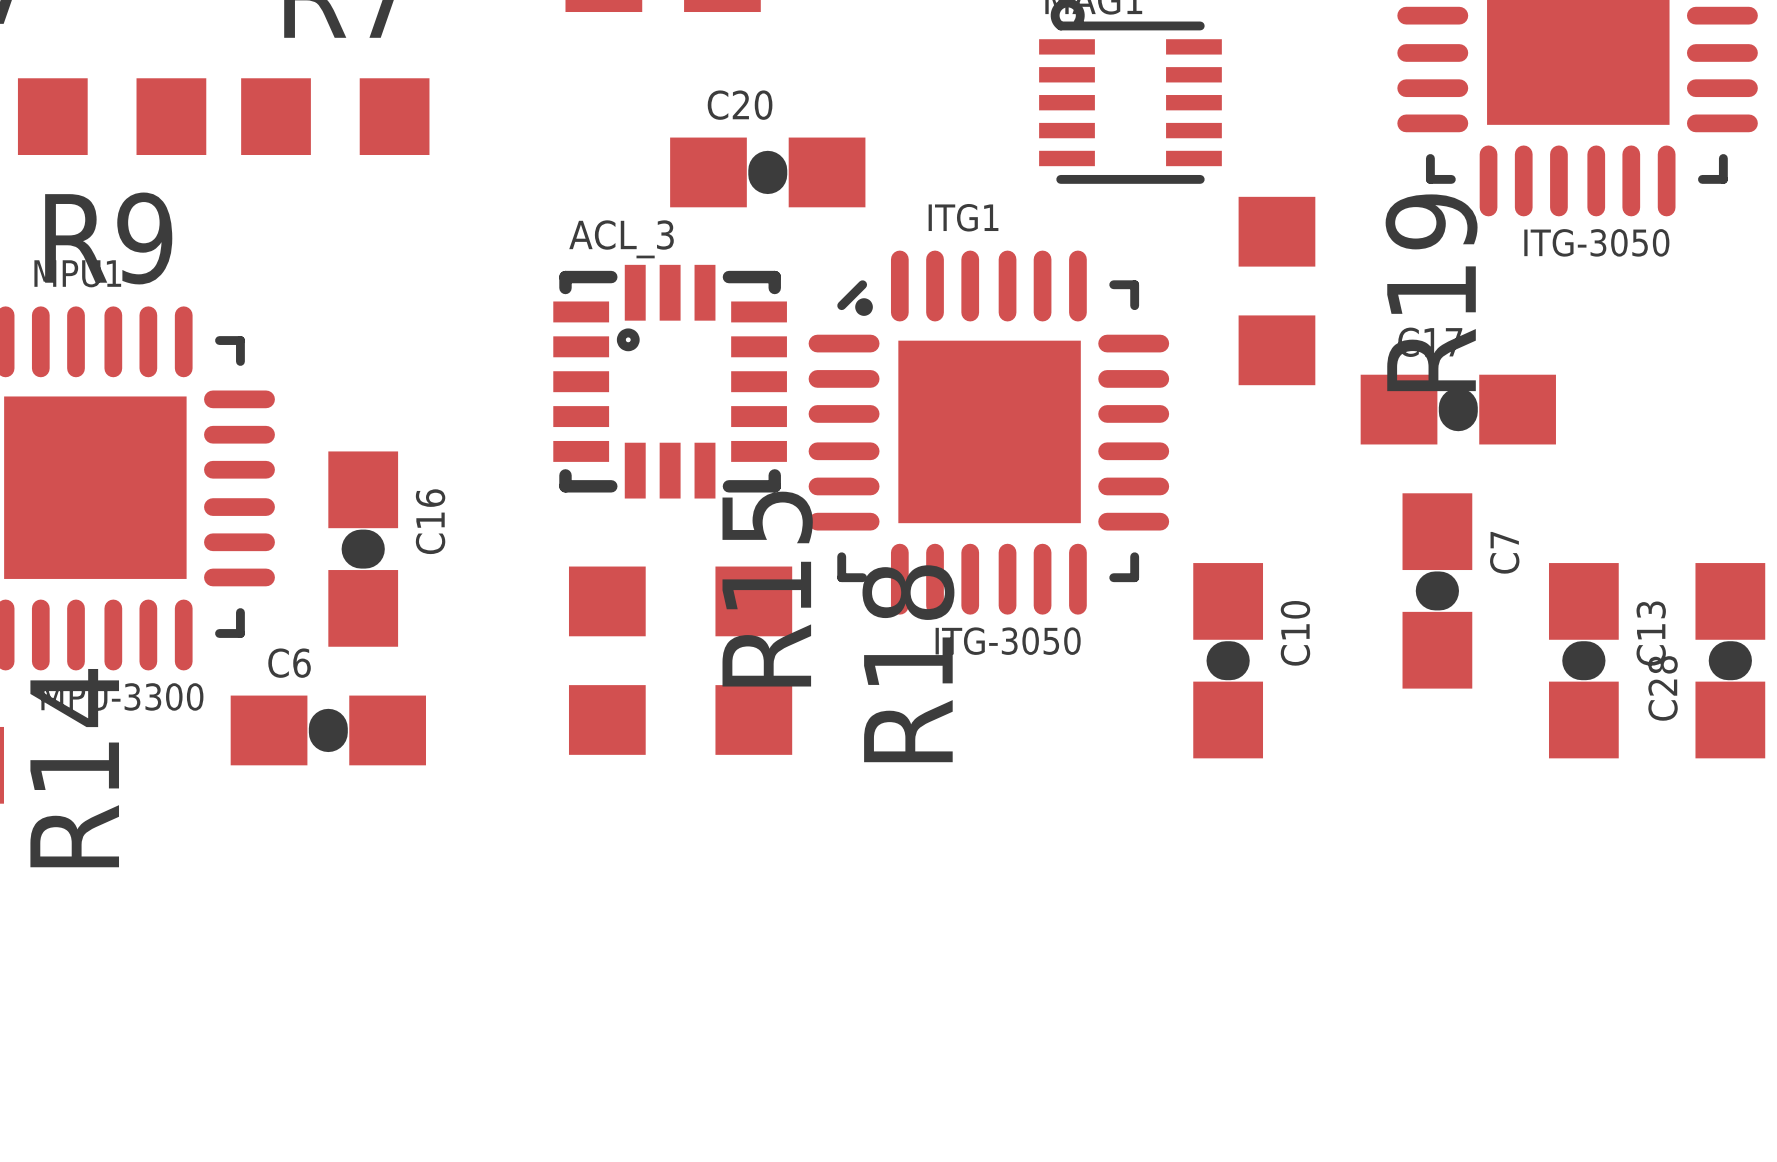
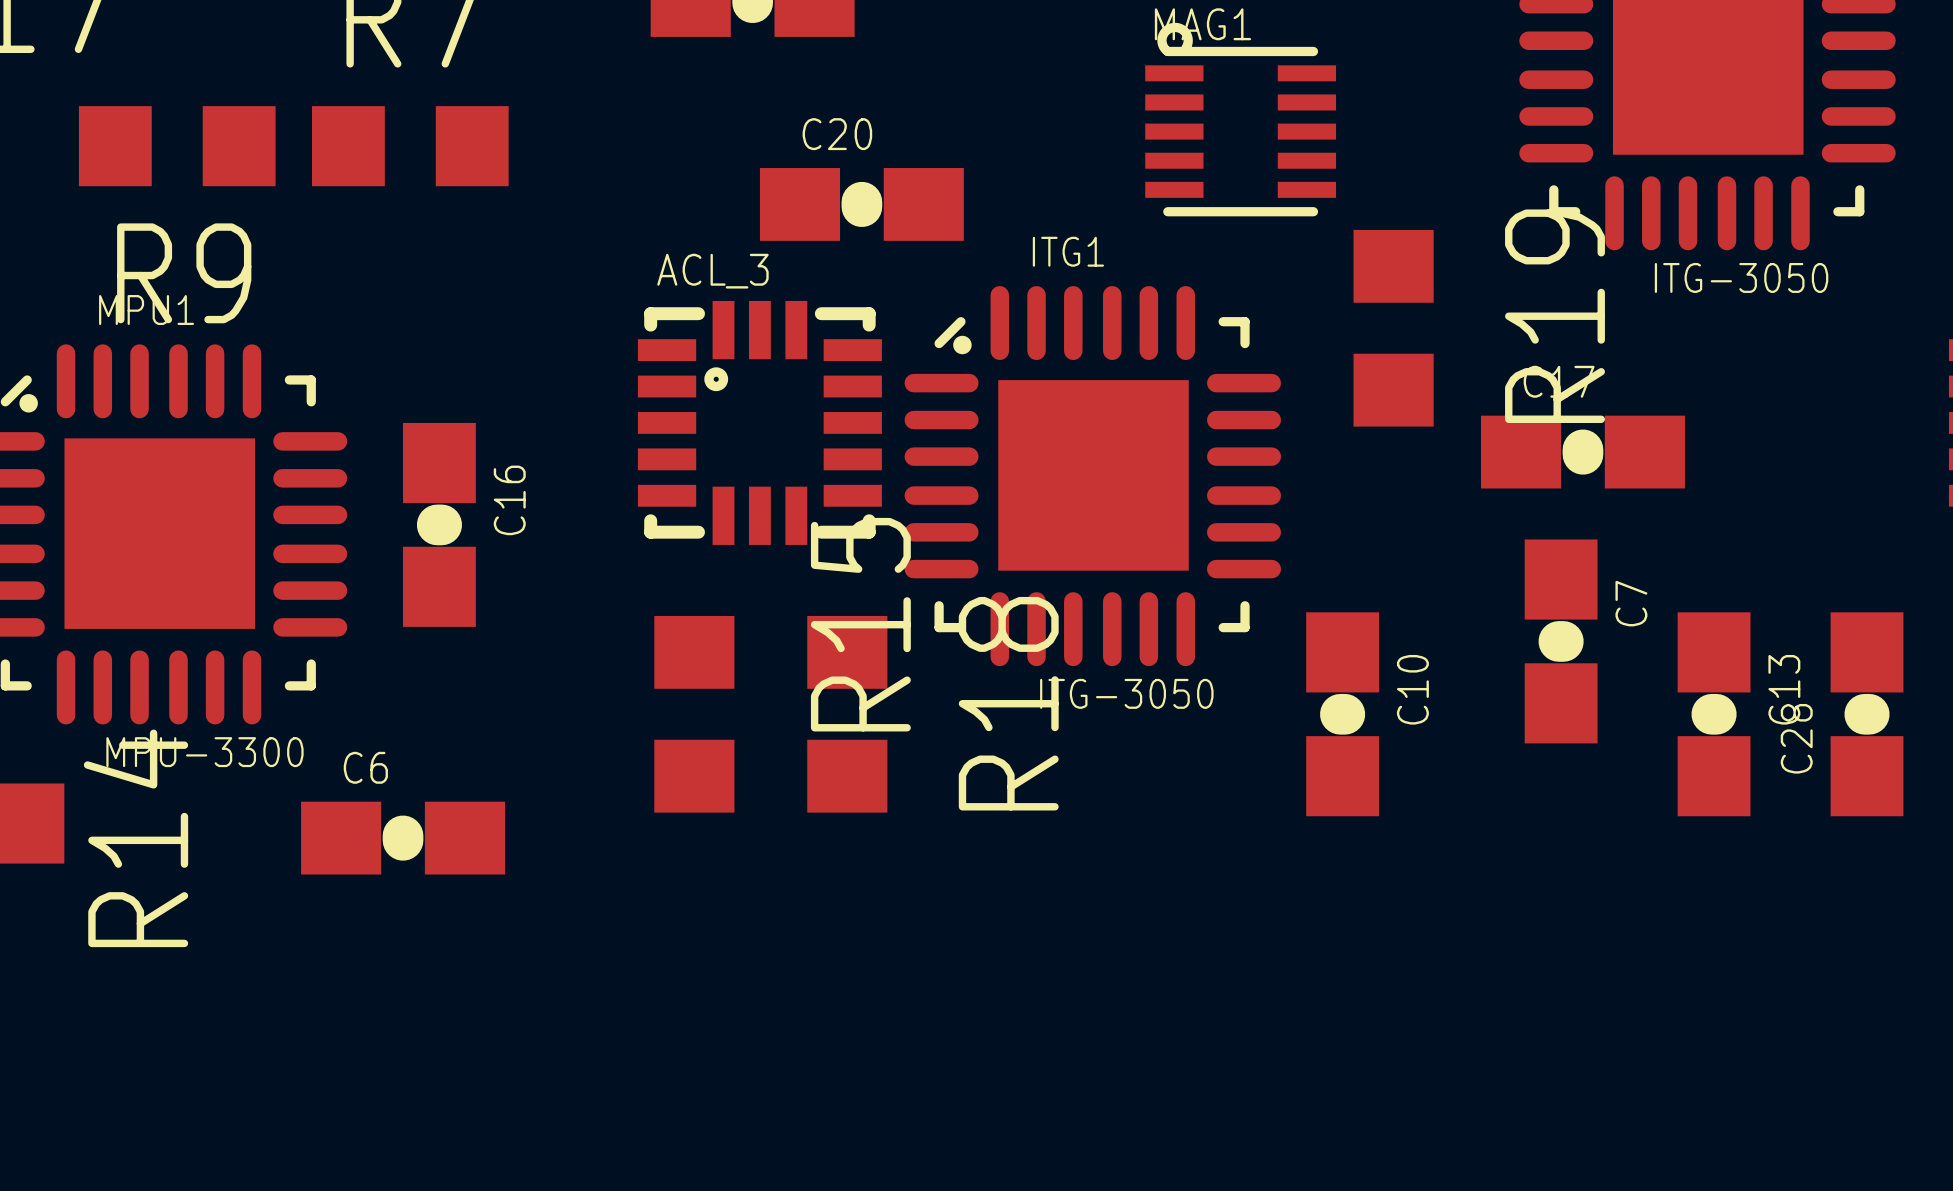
C16 position: (363, 549) -> (439, 524)
C6 position: (328, 730) -> (403, 838)

